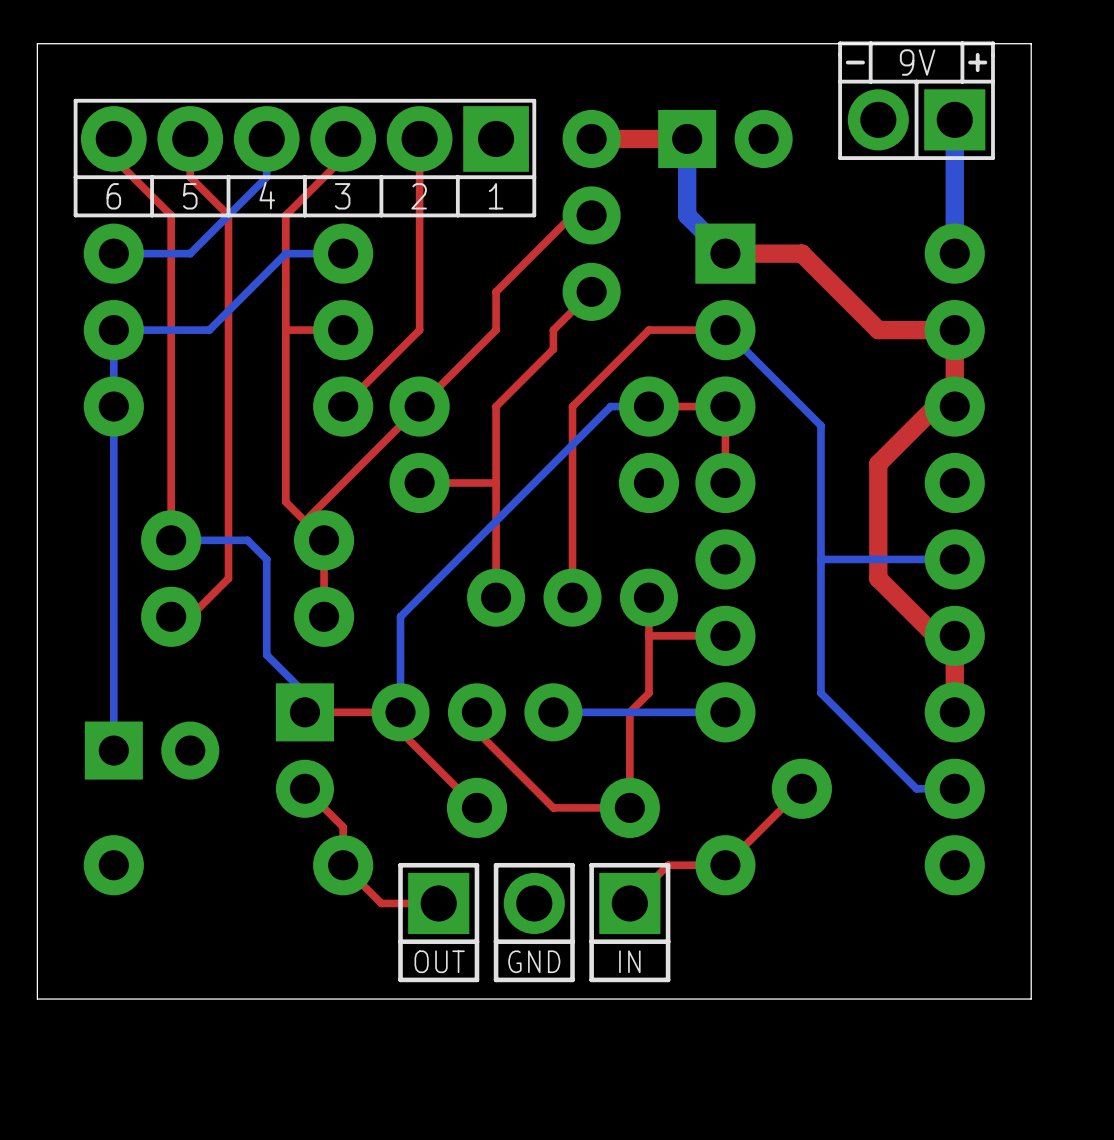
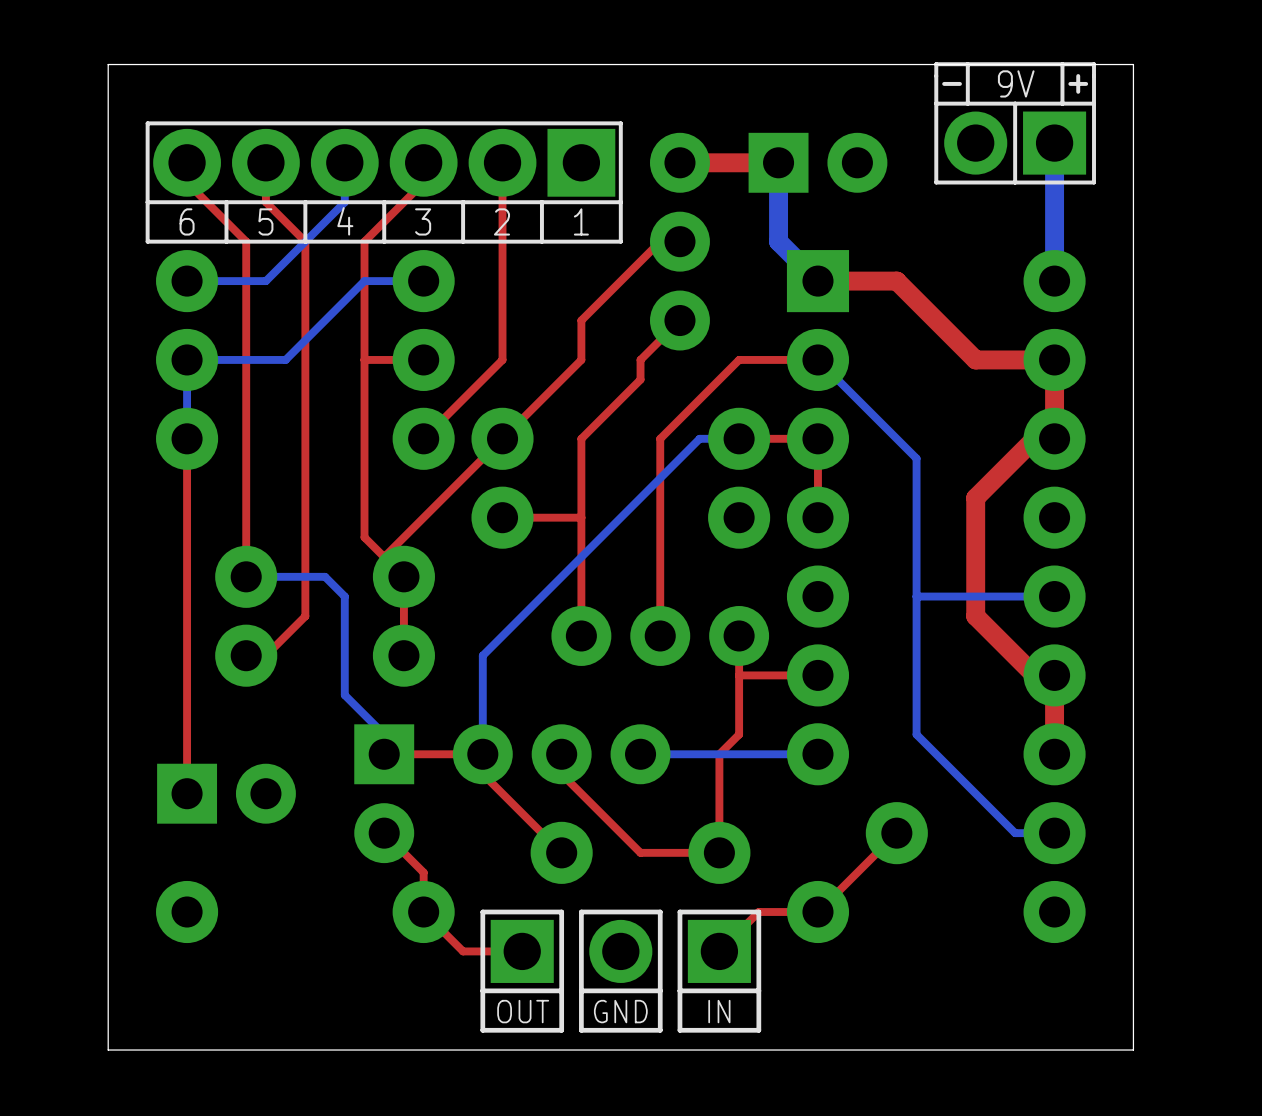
bottom track: (113, 406) (113, 750) -> none
top track: none -> (187, 438) (187, 793)

